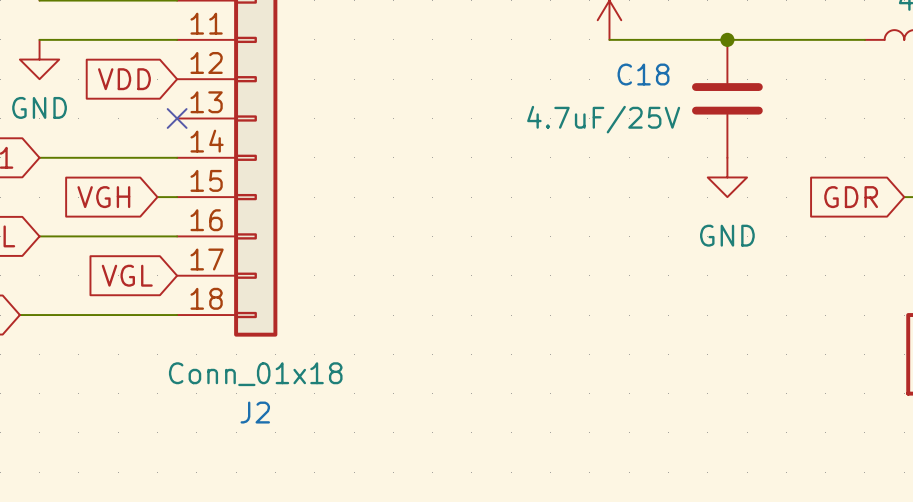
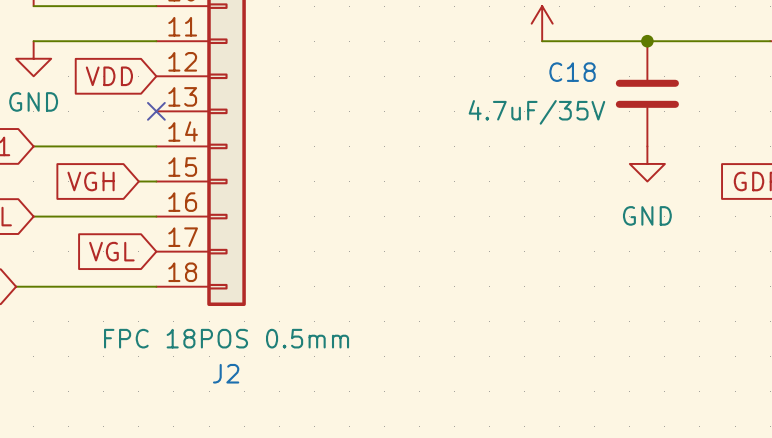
C18 value: 4.7uF/25V (603, 119) -> 4.7uF/35V (536, 112)
J2 value: Conn_01x18 (255, 374) -> FPC 18POS 0.5mm (226, 338)

